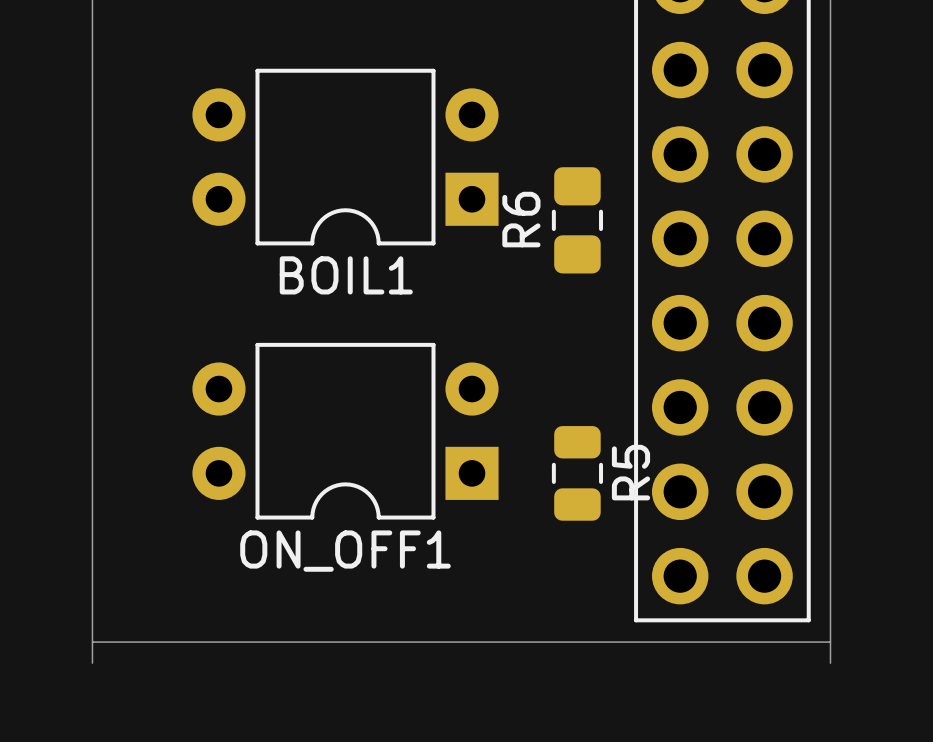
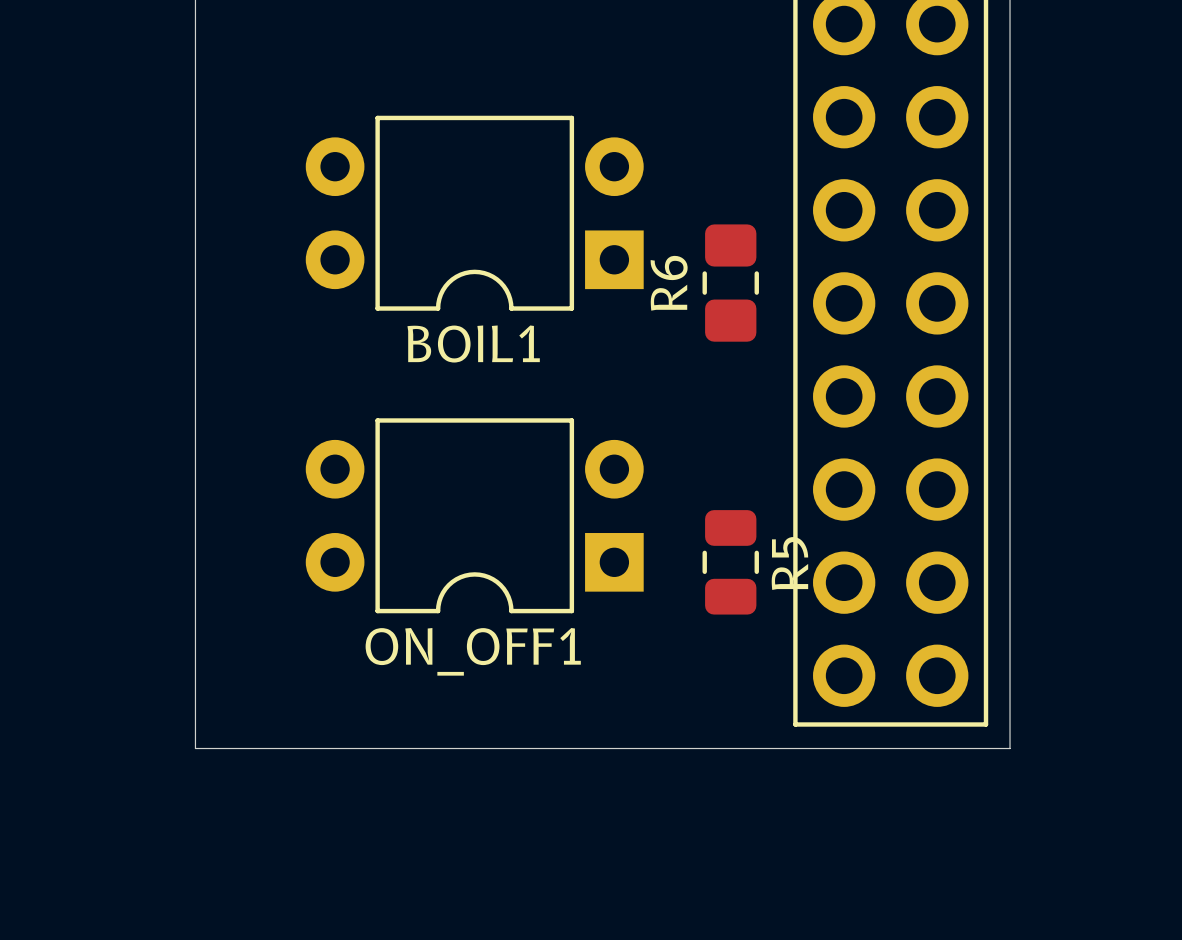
board edge: (92, 642) (92, 663) -> none
board edge: (830, 642) (830, 663) -> none

